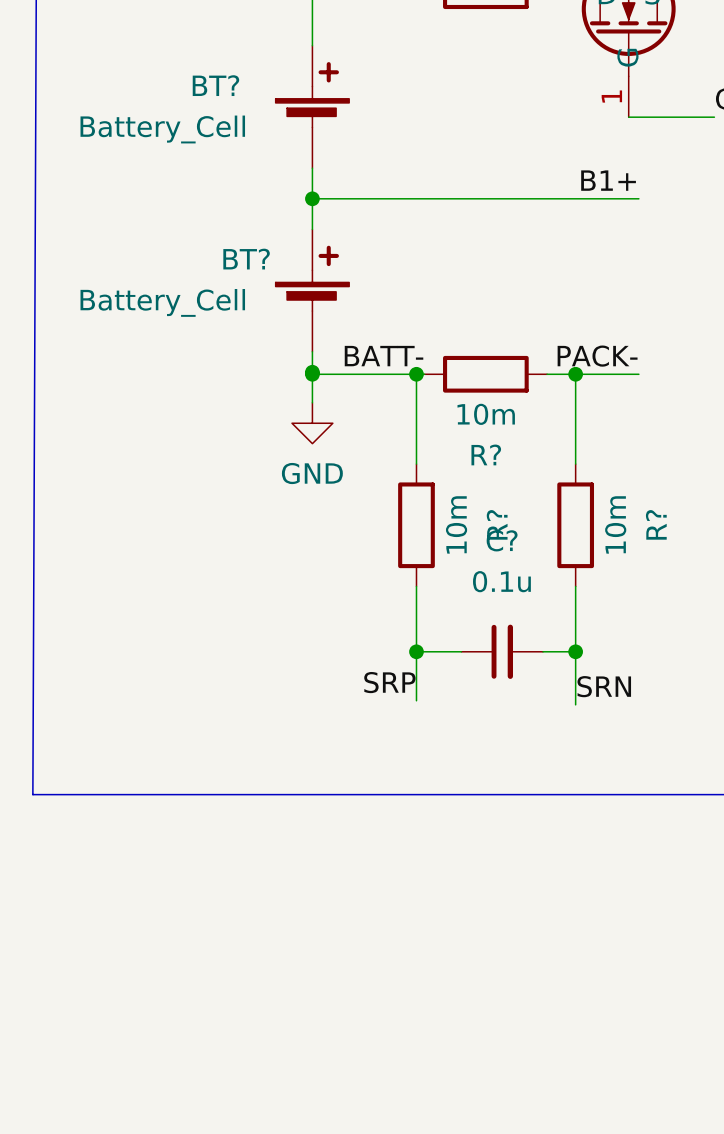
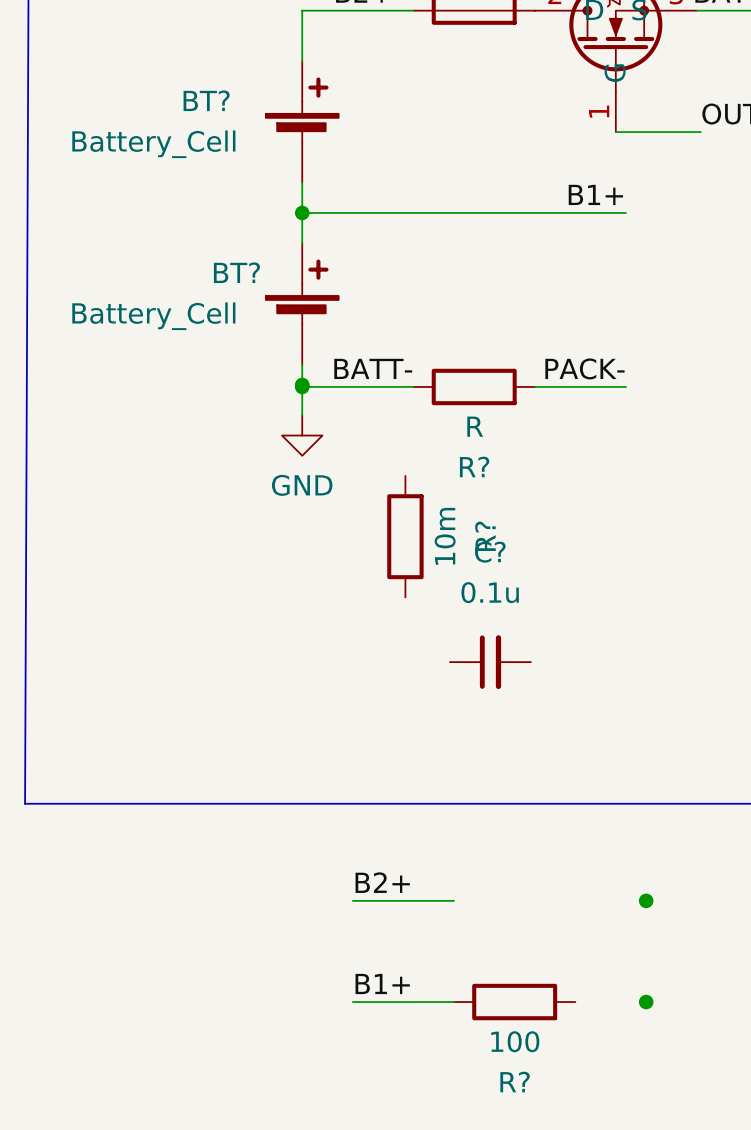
wire: (416, 374) (416, 464) -> none
junction: (416, 374) -> none
wire: (575, 374) (575, 464) -> none
junction: (575, 374) -> none
R? value: 10m (486, 414) -> R (475, 426)
R?: 10m (575, 525) -> none
wire: (416, 586) (416, 700) -> none
wire: (575, 586) (575, 704) -> none
wire: (416, 651) (461, 651) -> none
junction: (416, 651) -> none
wire: (542, 651) (575, 651) -> none
junction: (575, 651) -> none
label: SRP (389, 682) -> none
label: SRN (604, 686) -> none
label: none -> B2+ (382, 882)
wire: none -> (352, 900) (453, 900)
junction: none -> (646, 900)
label: none -> B1+ (382, 983)
wire: none -> (352, 1002) (453, 1002)
R?: none -> 100 (514, 1002)
junction: none -> (646, 1002)

